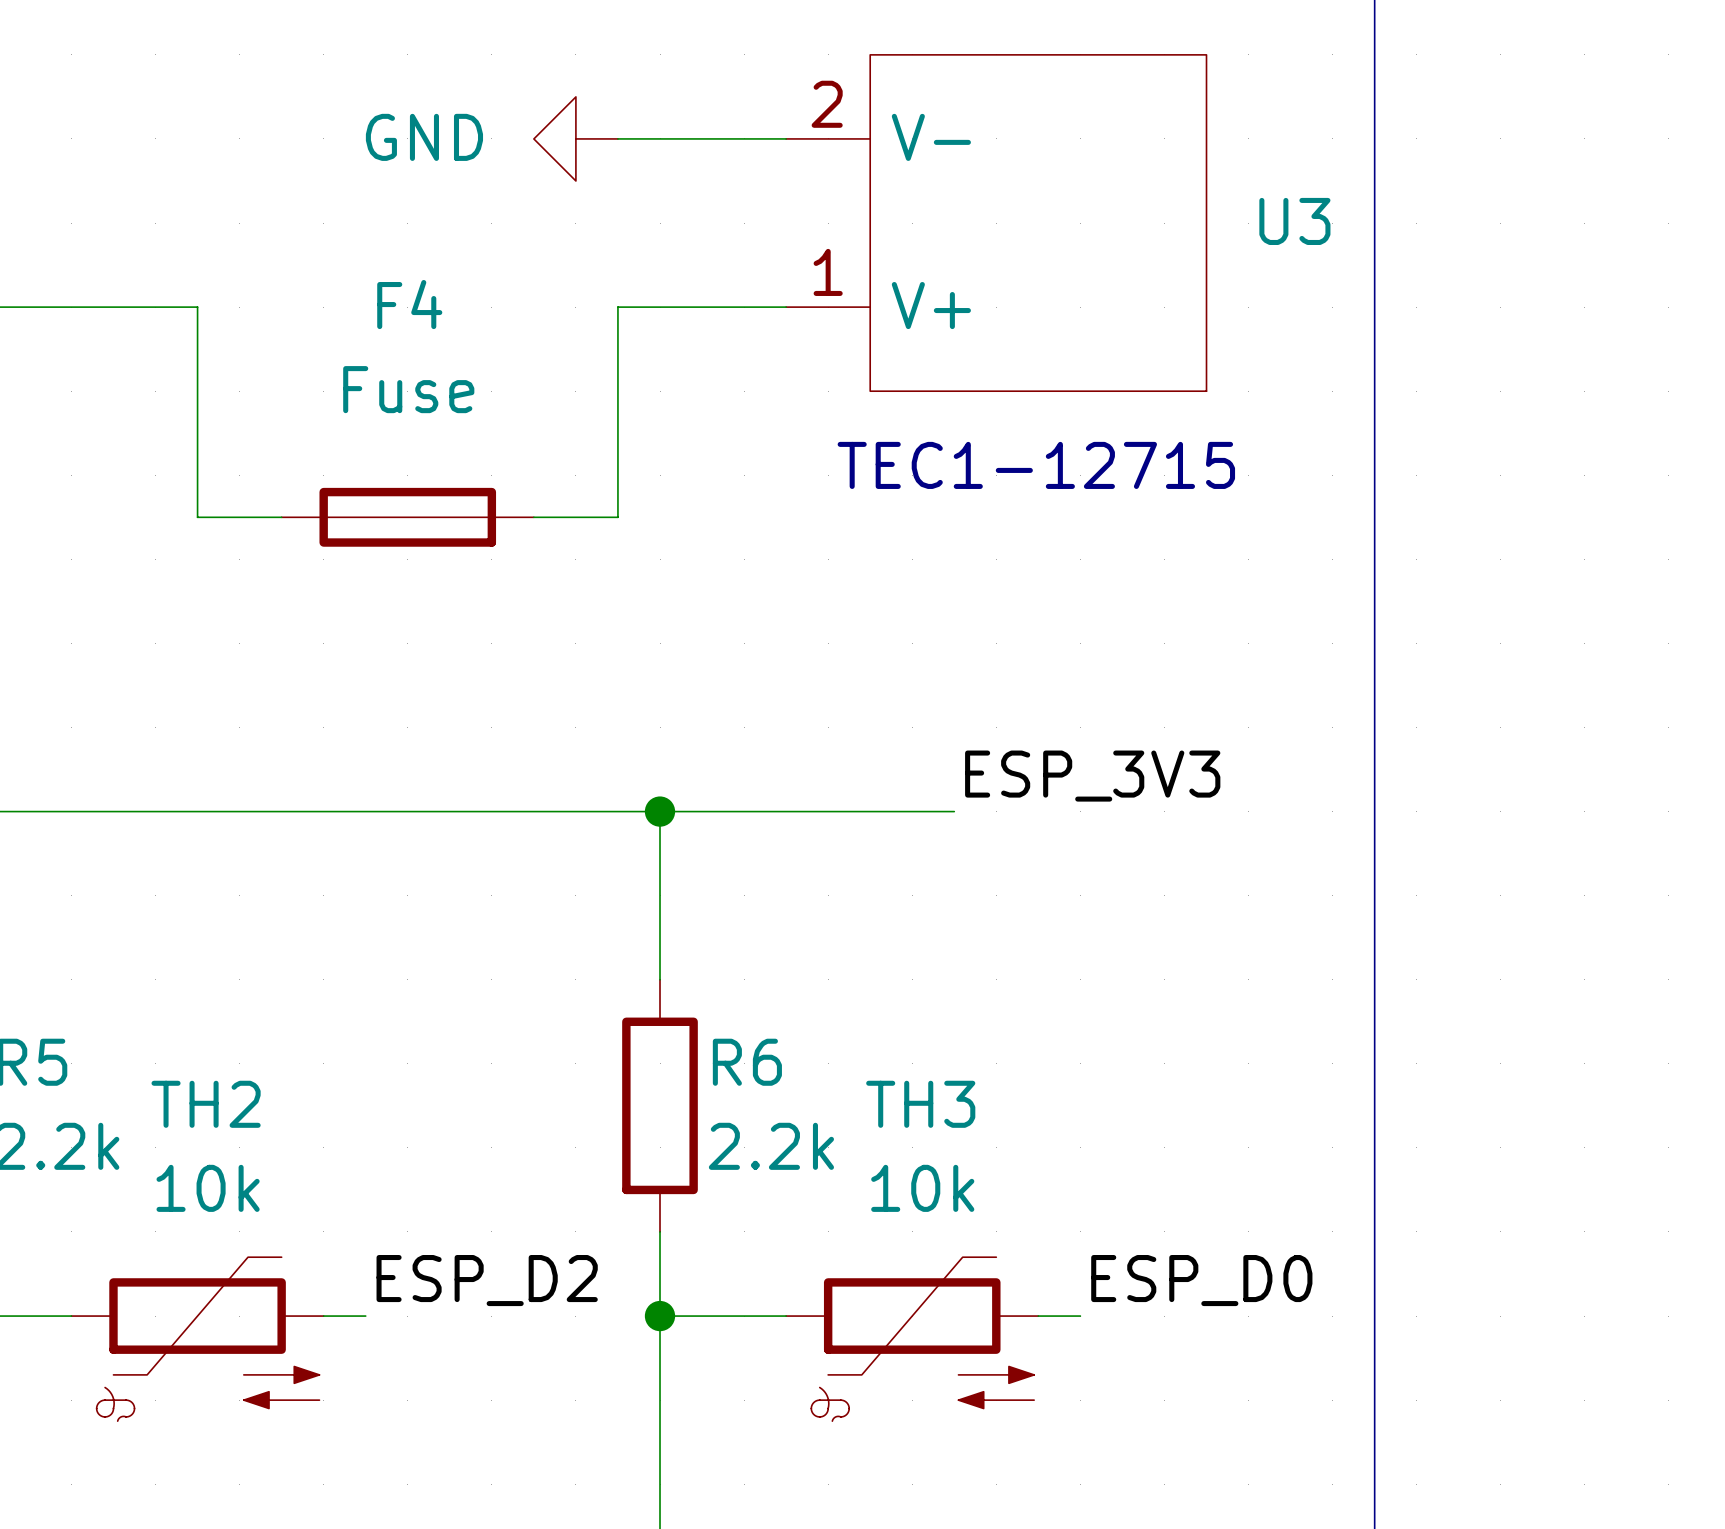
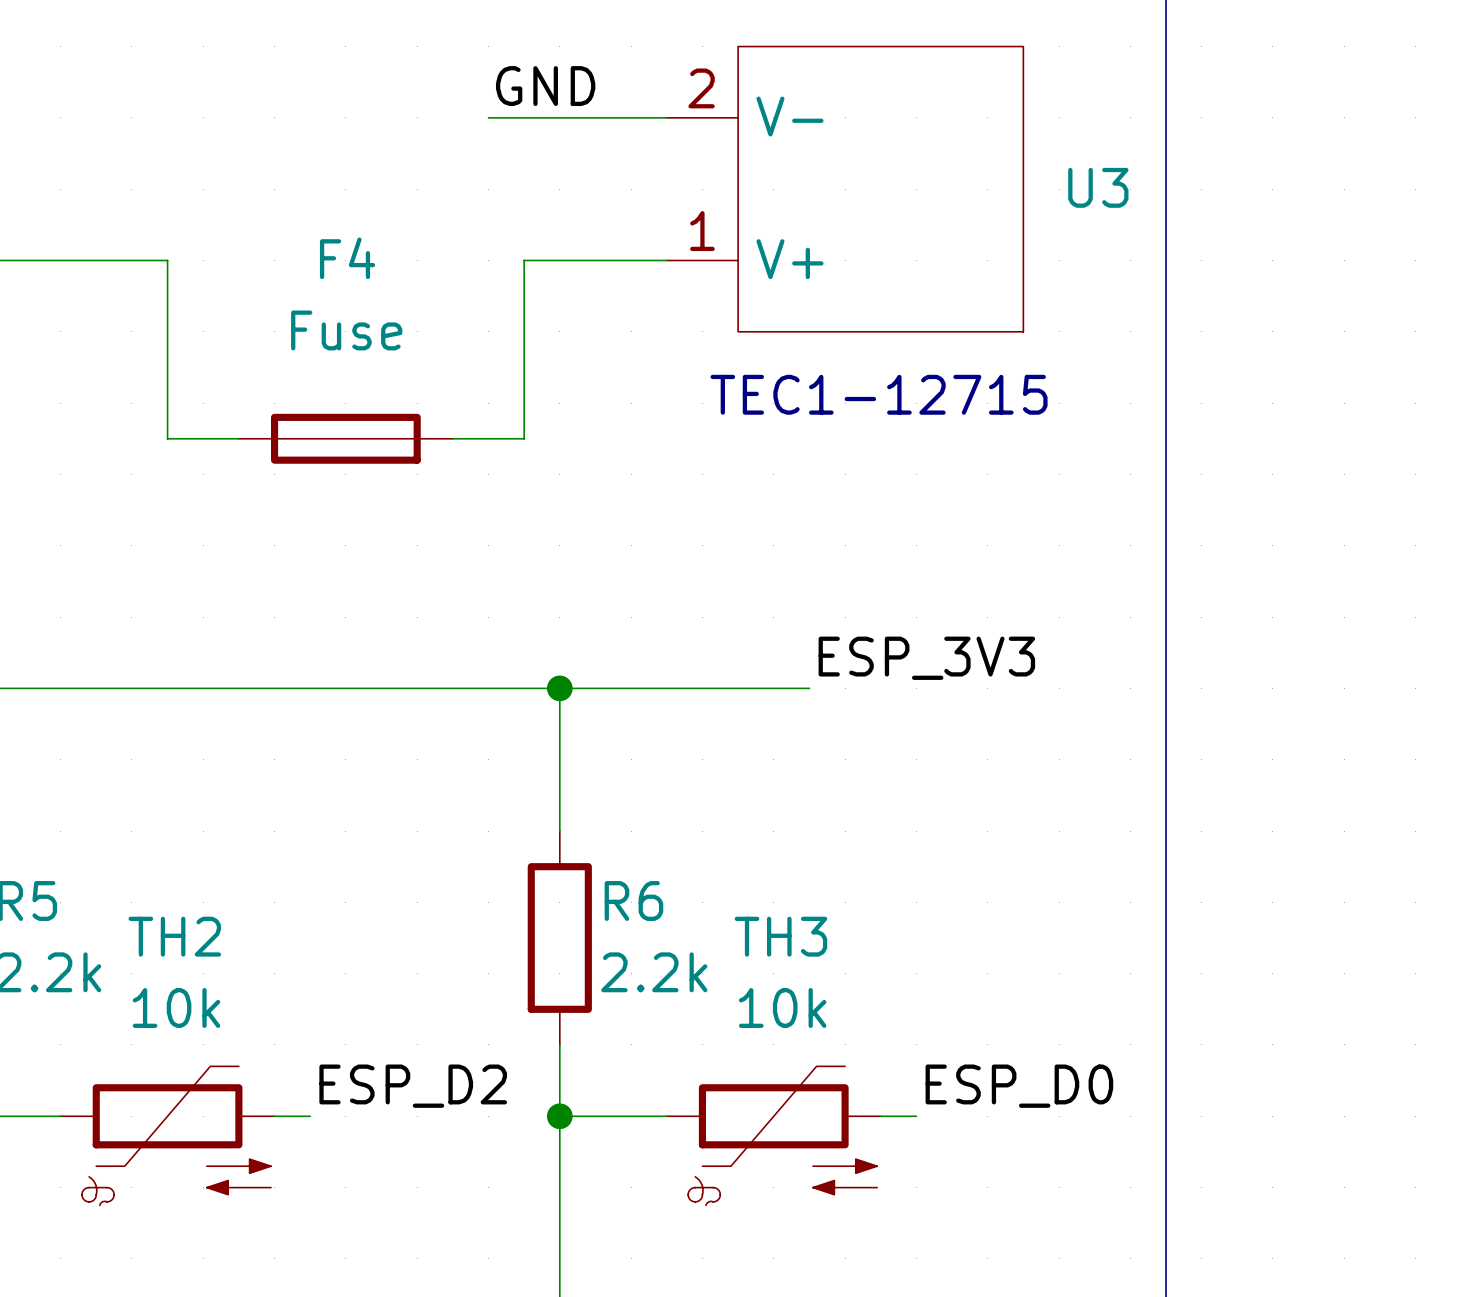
label: none -> GND (545, 86)
power symbol: GND (575, 138) -> none

